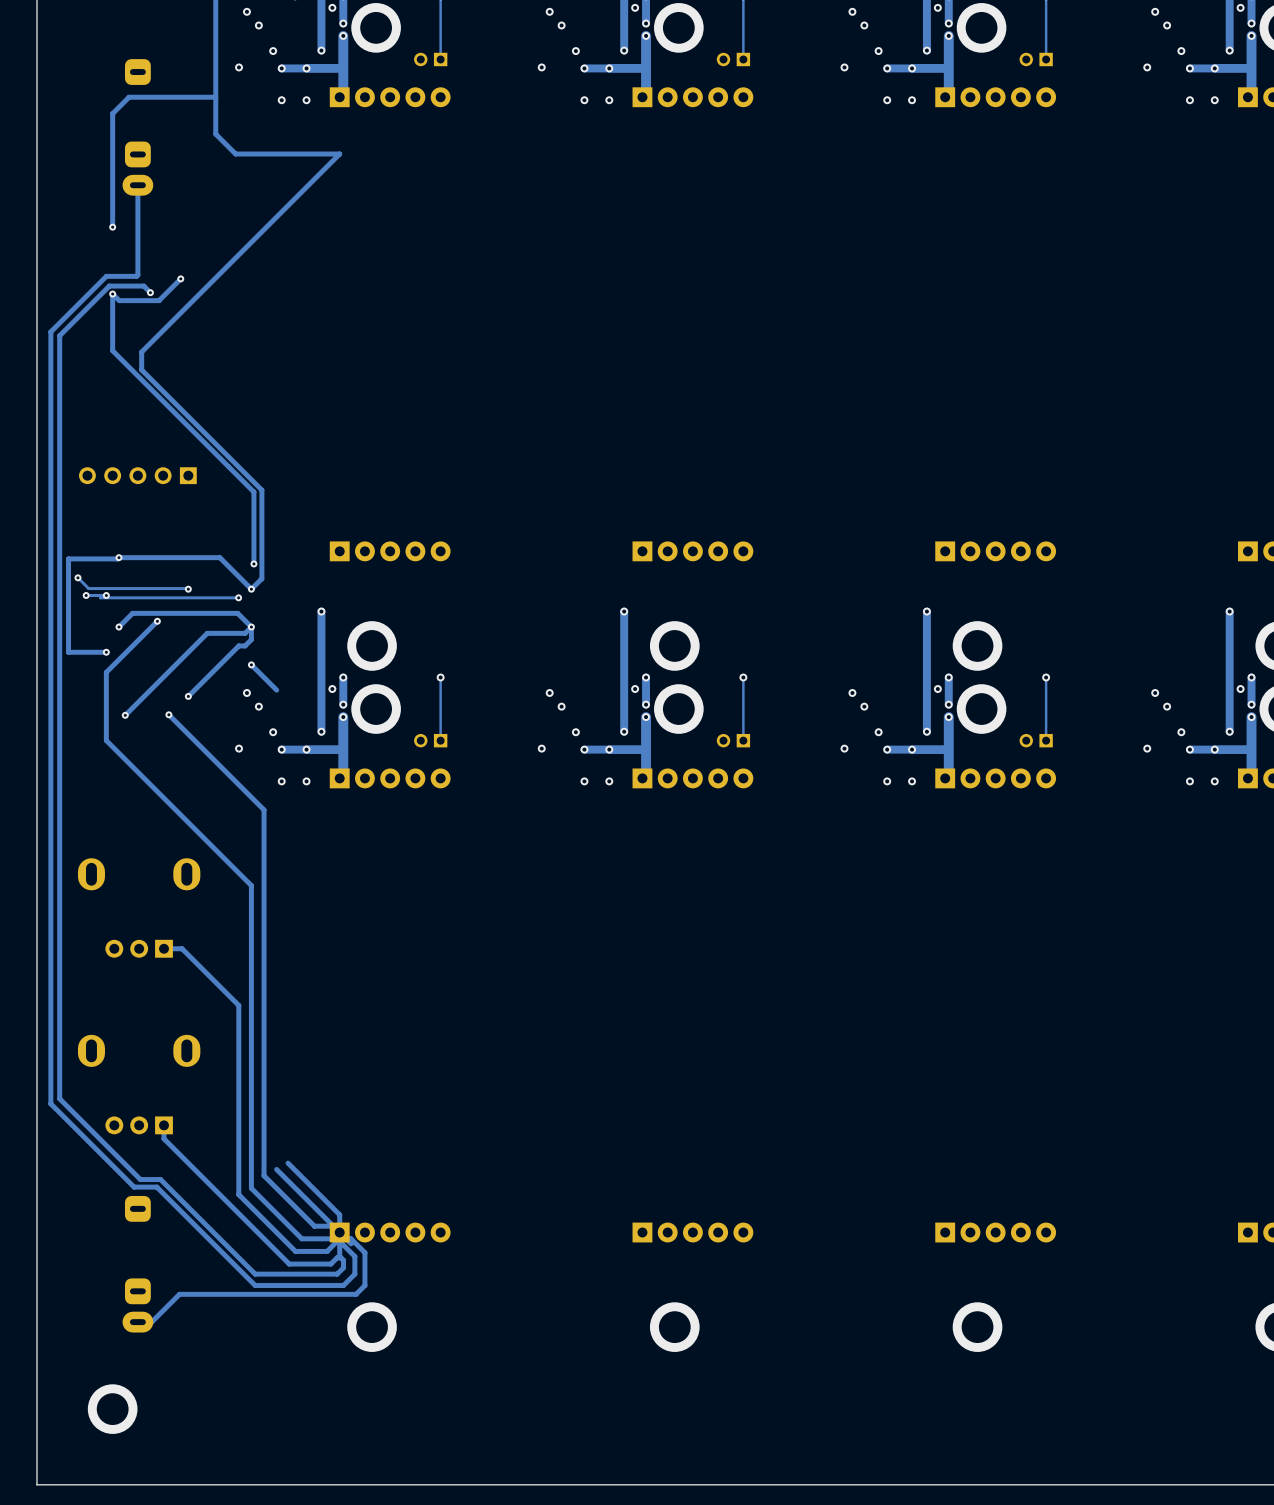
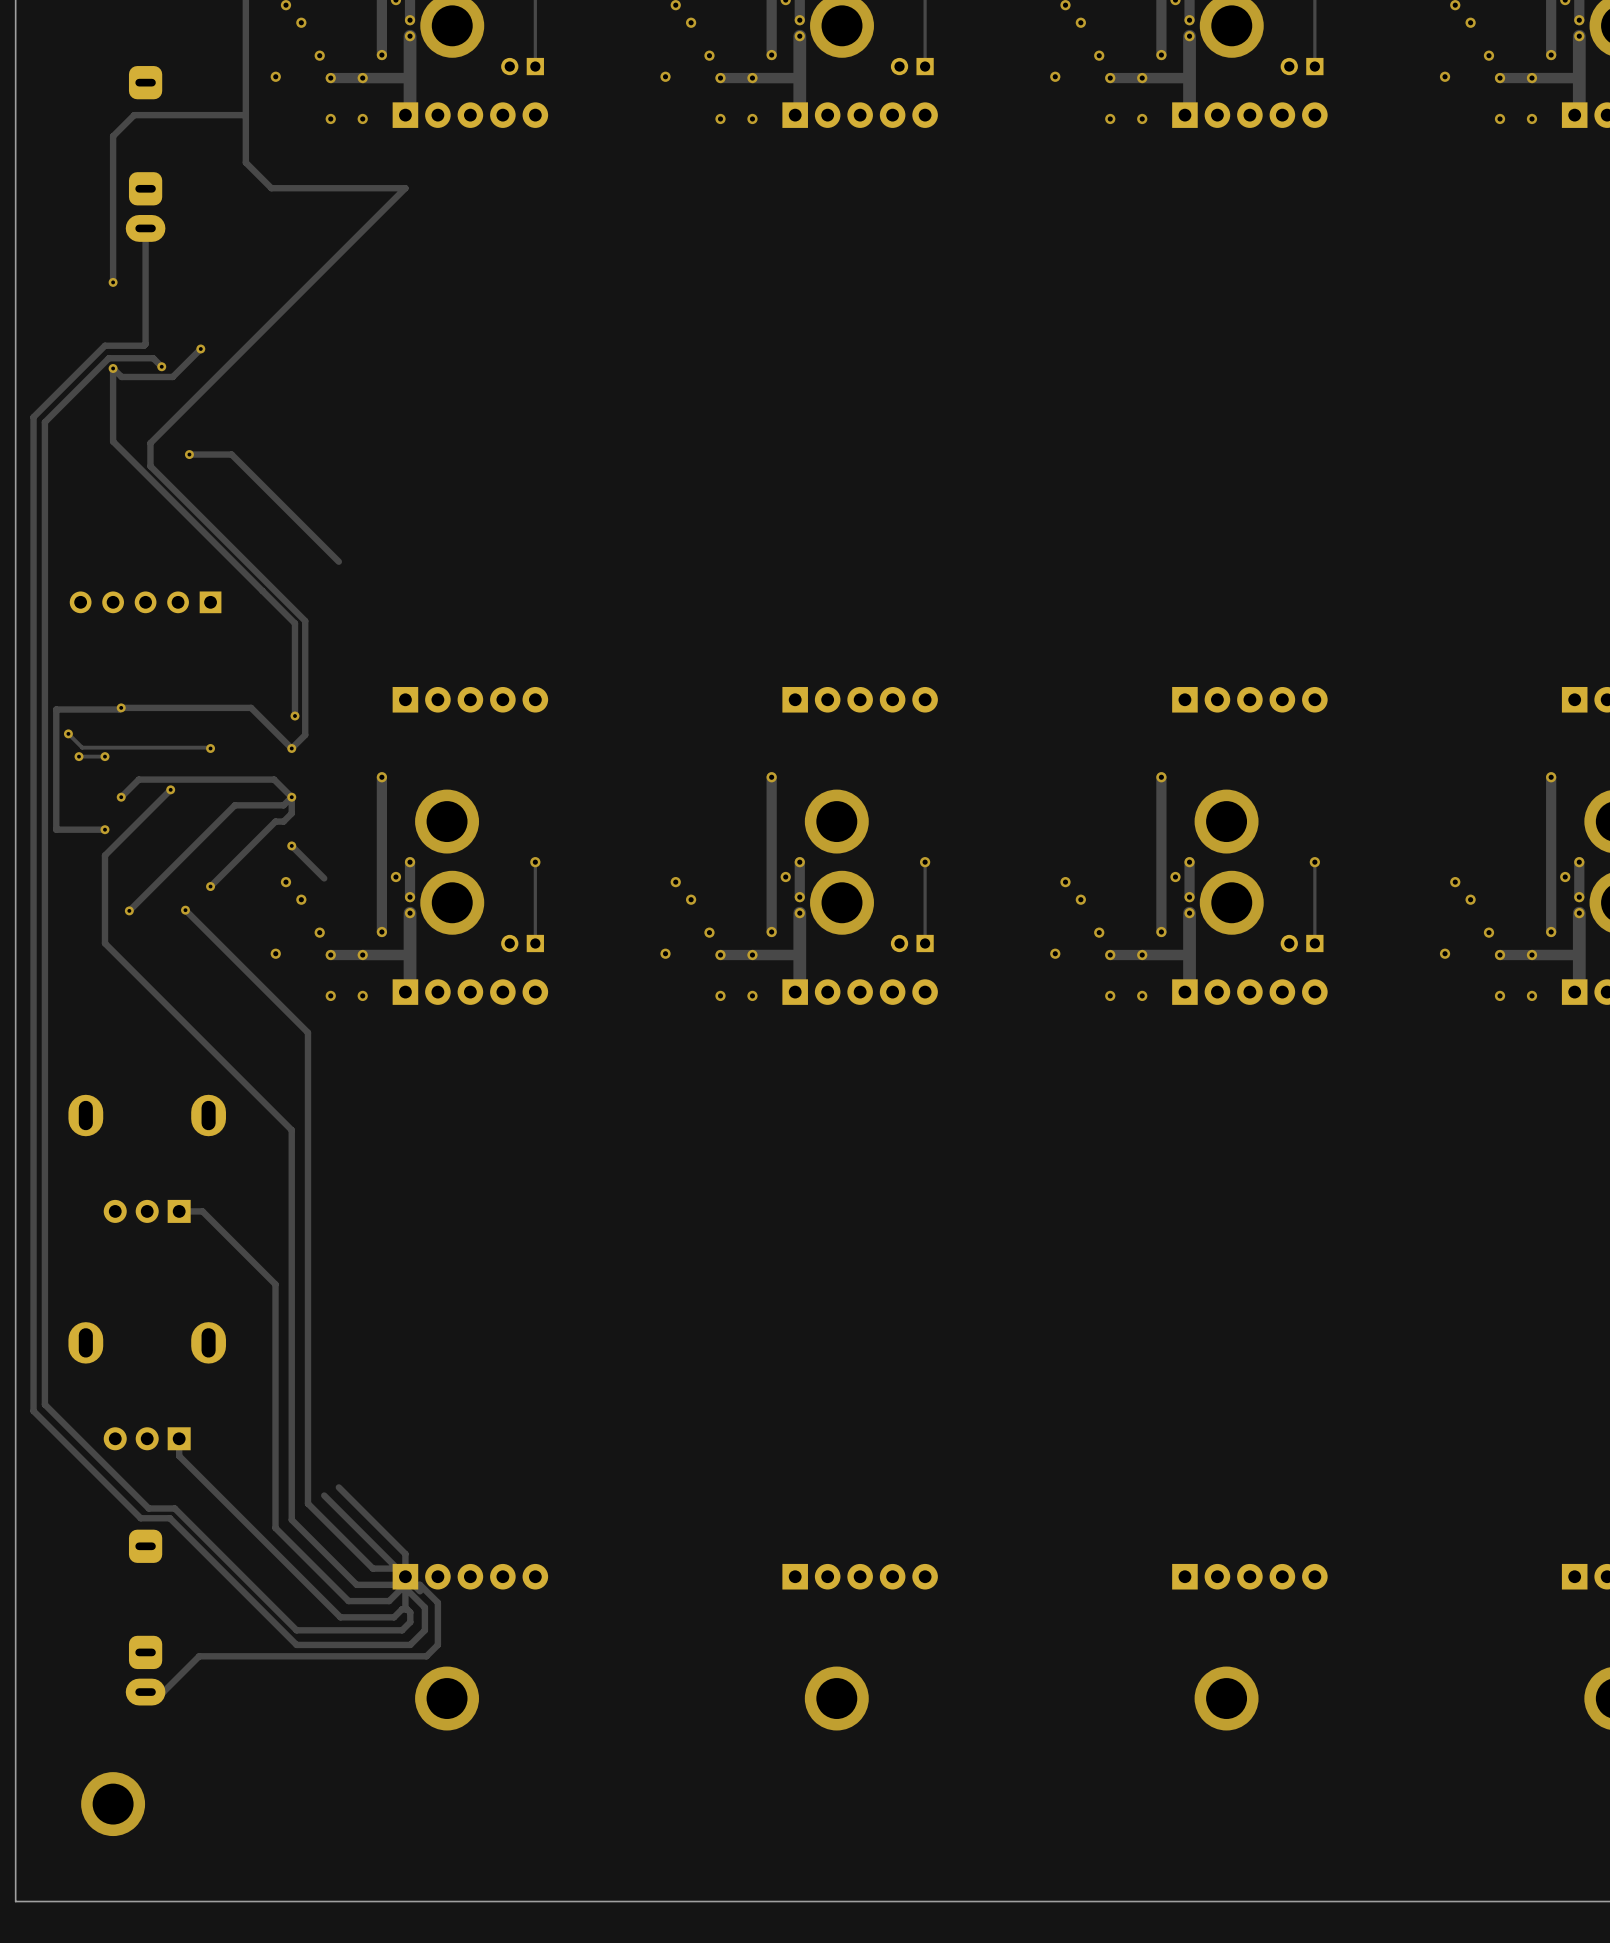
track: none -> (189, 454) (231, 454) (338, 561)
via: none -> (189, 454)
track: (100, 595) (100, 597) (238, 597) -> none
via: (238, 597) -> none

